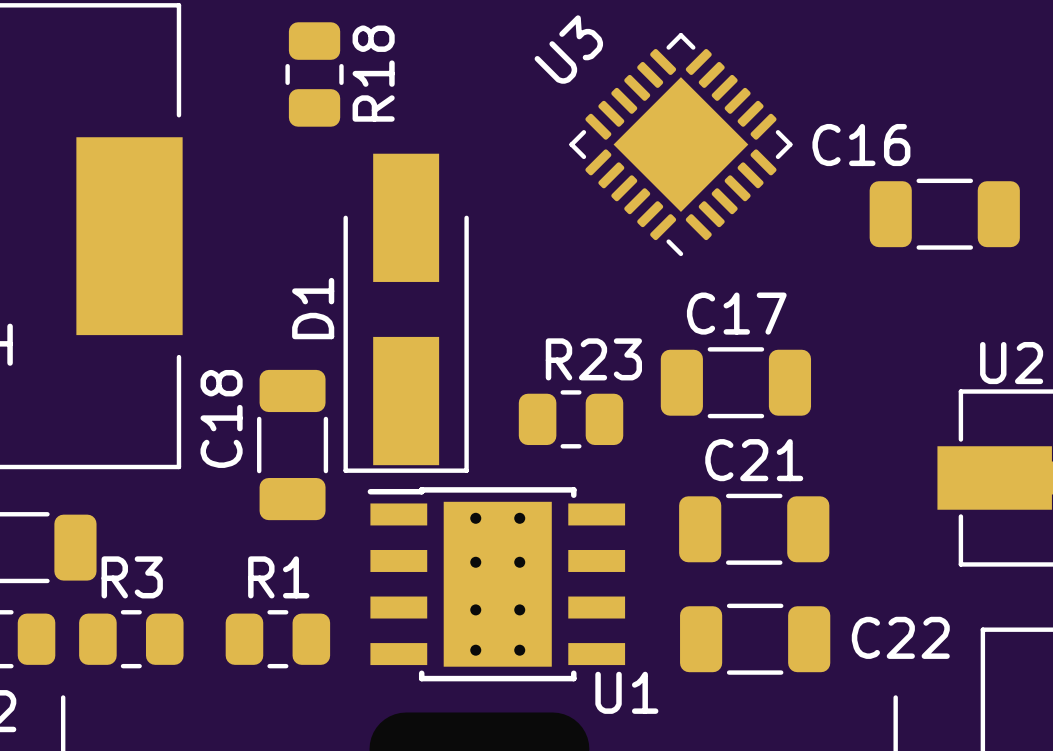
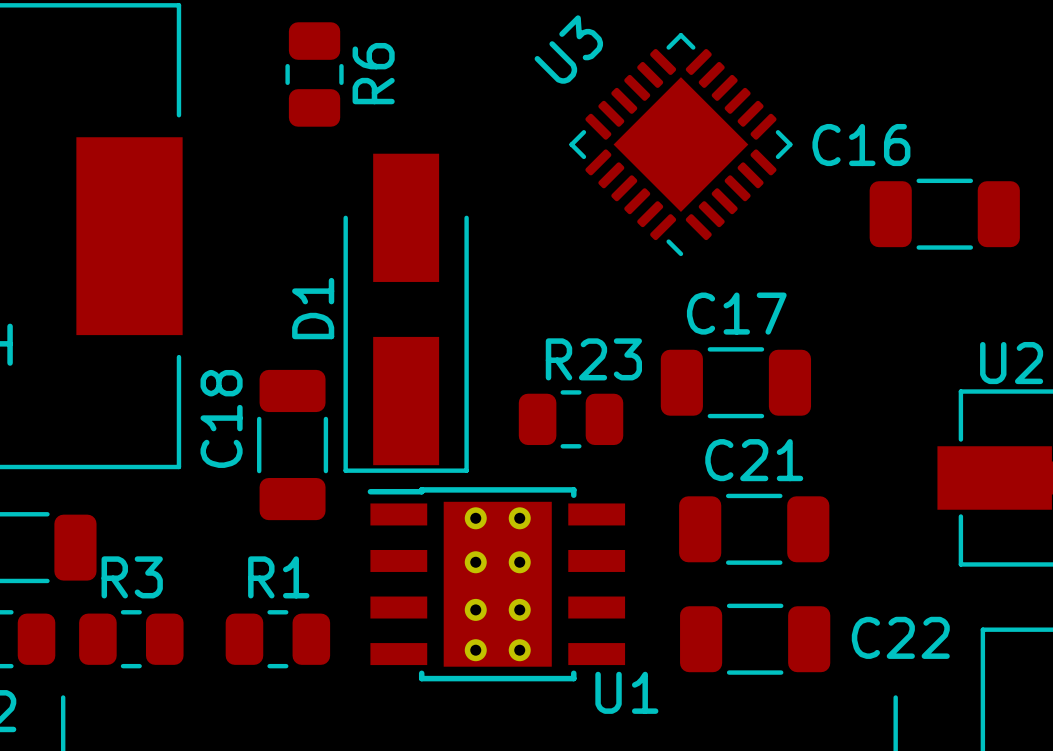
R18 name: R18 (373, 73) -> R6 (373, 73)

